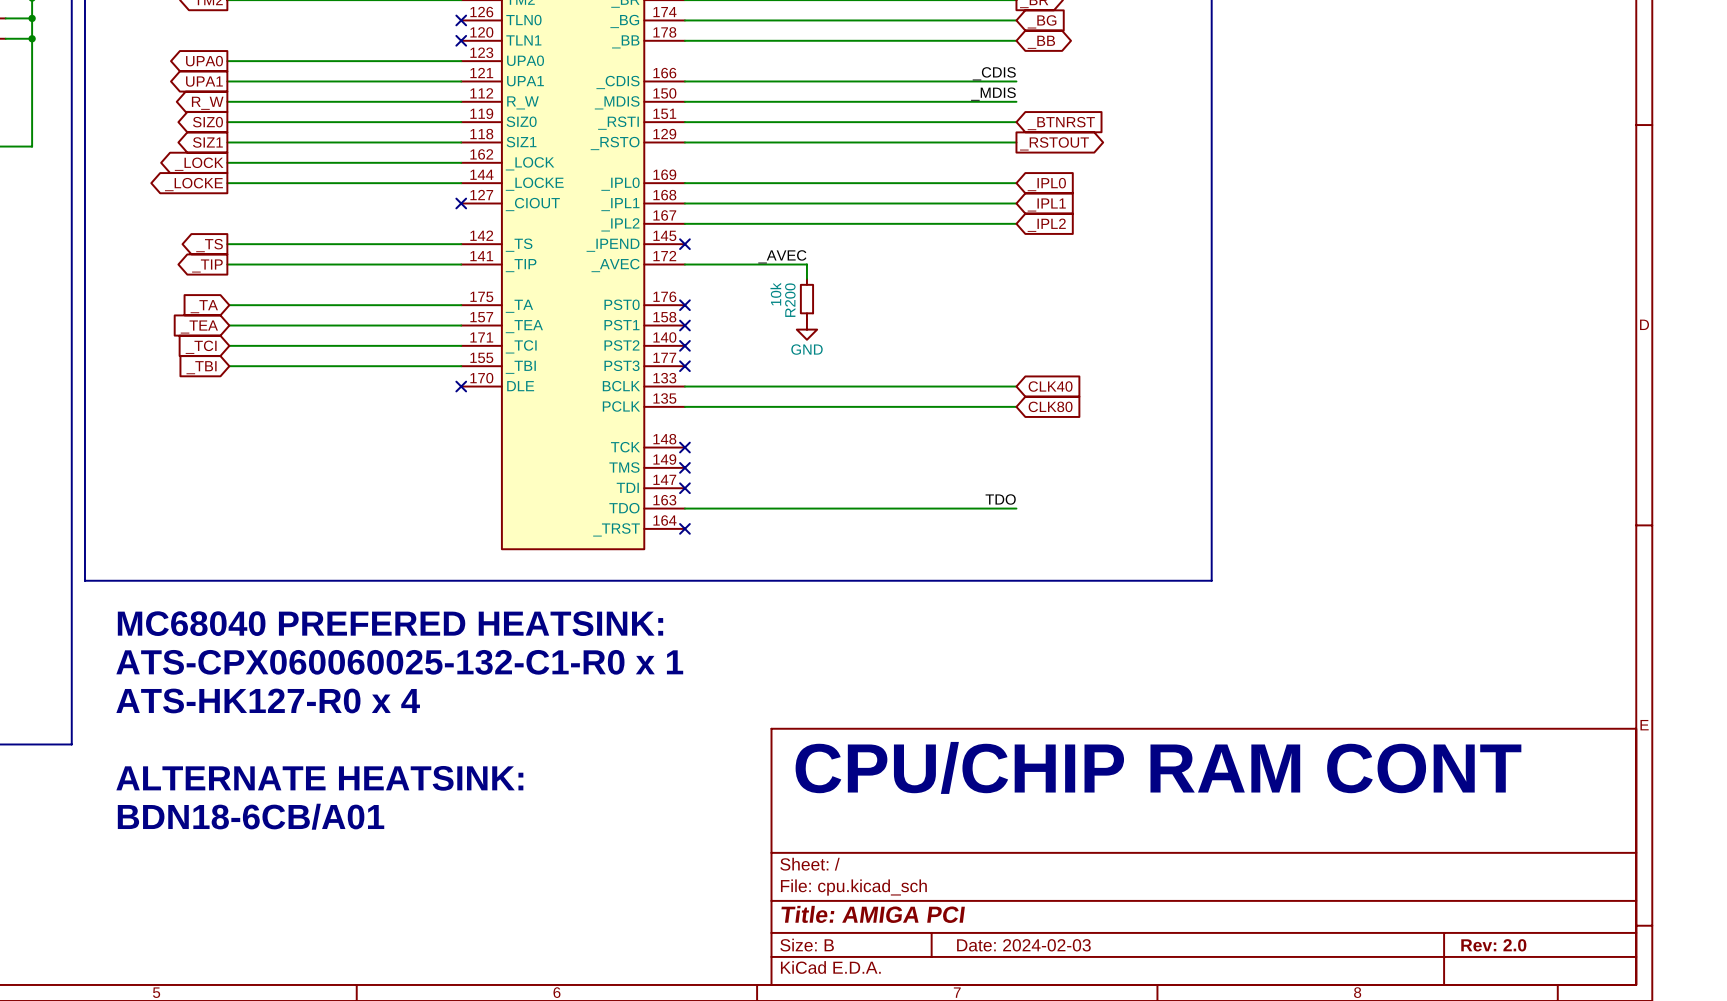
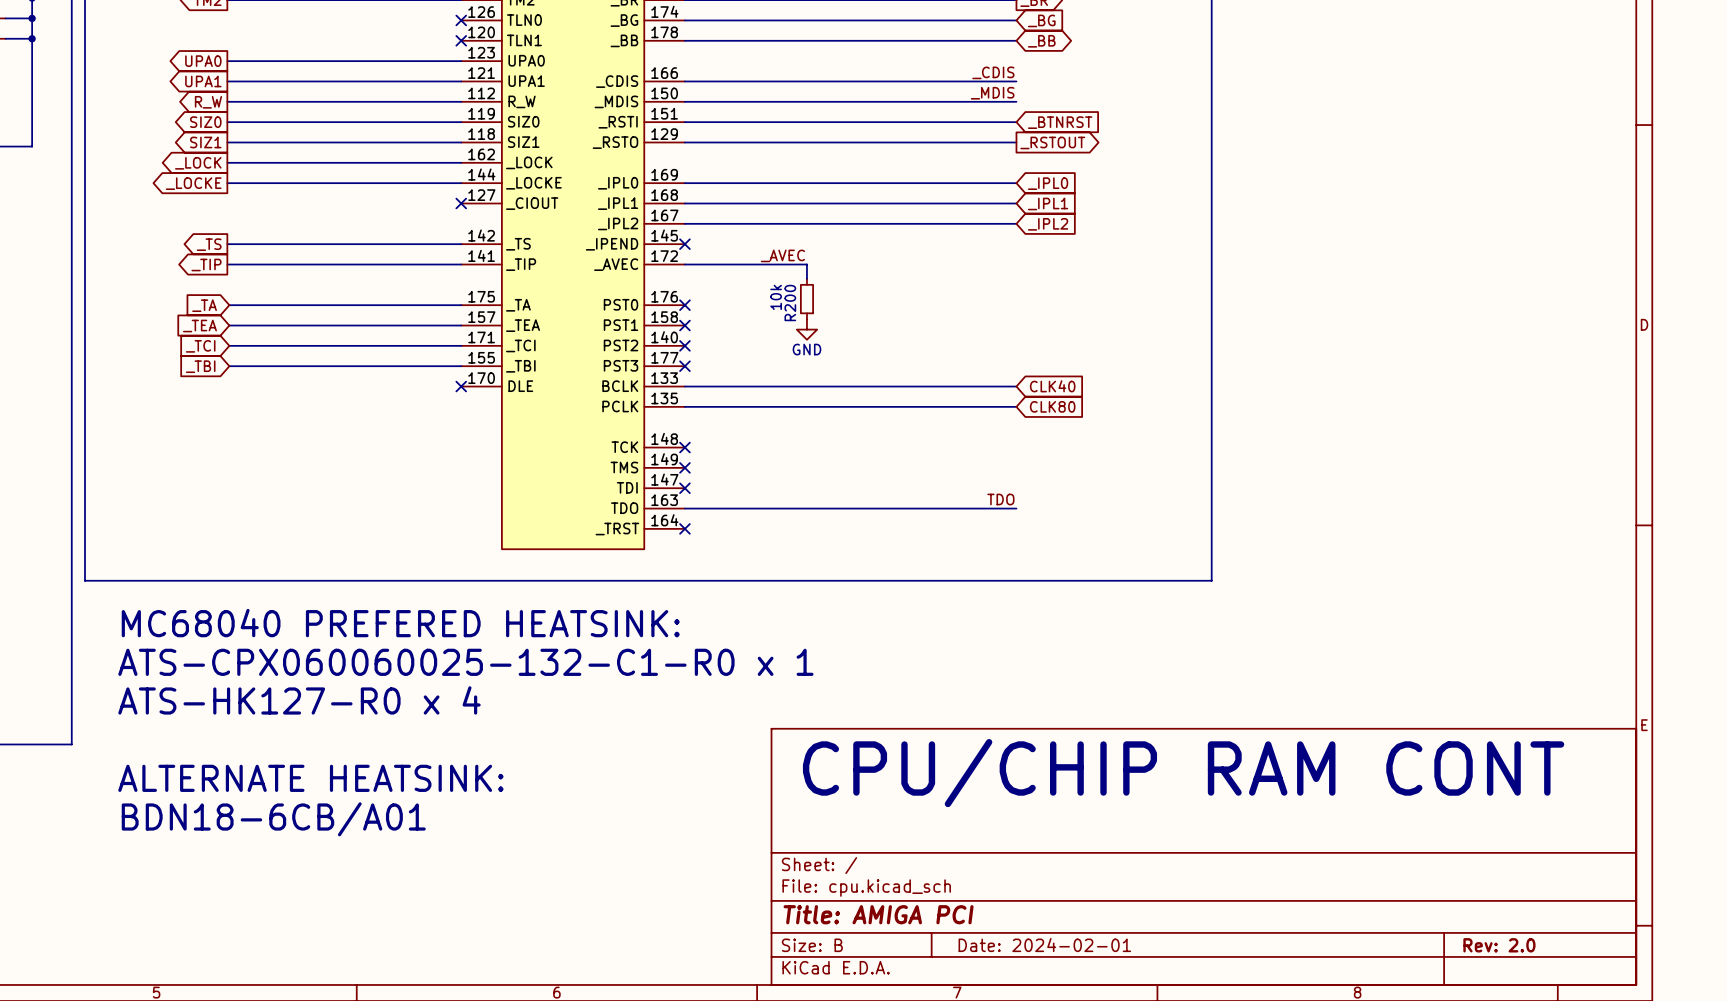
title block: Date: 2024-02-03 (1023, 945) -> Date: 2024-02-01 (1044, 945)

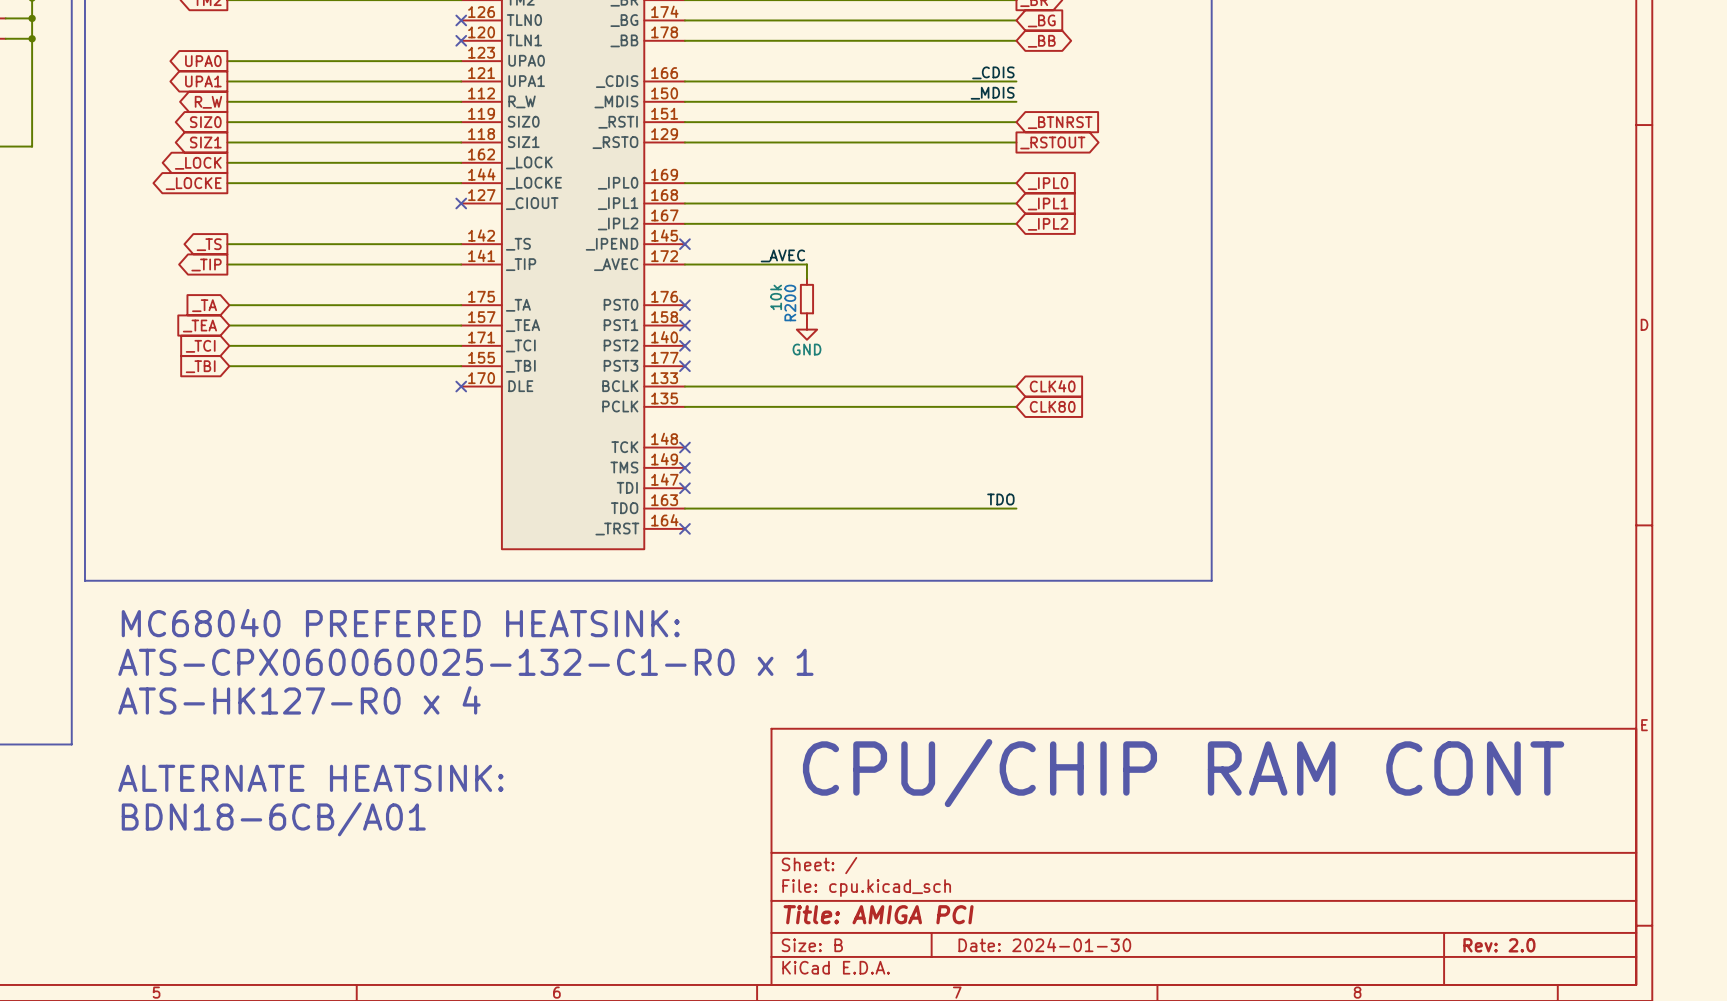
title block: Date: 2024-02-01 (1044, 945) -> Date: 2024-01-30 (1044, 945)

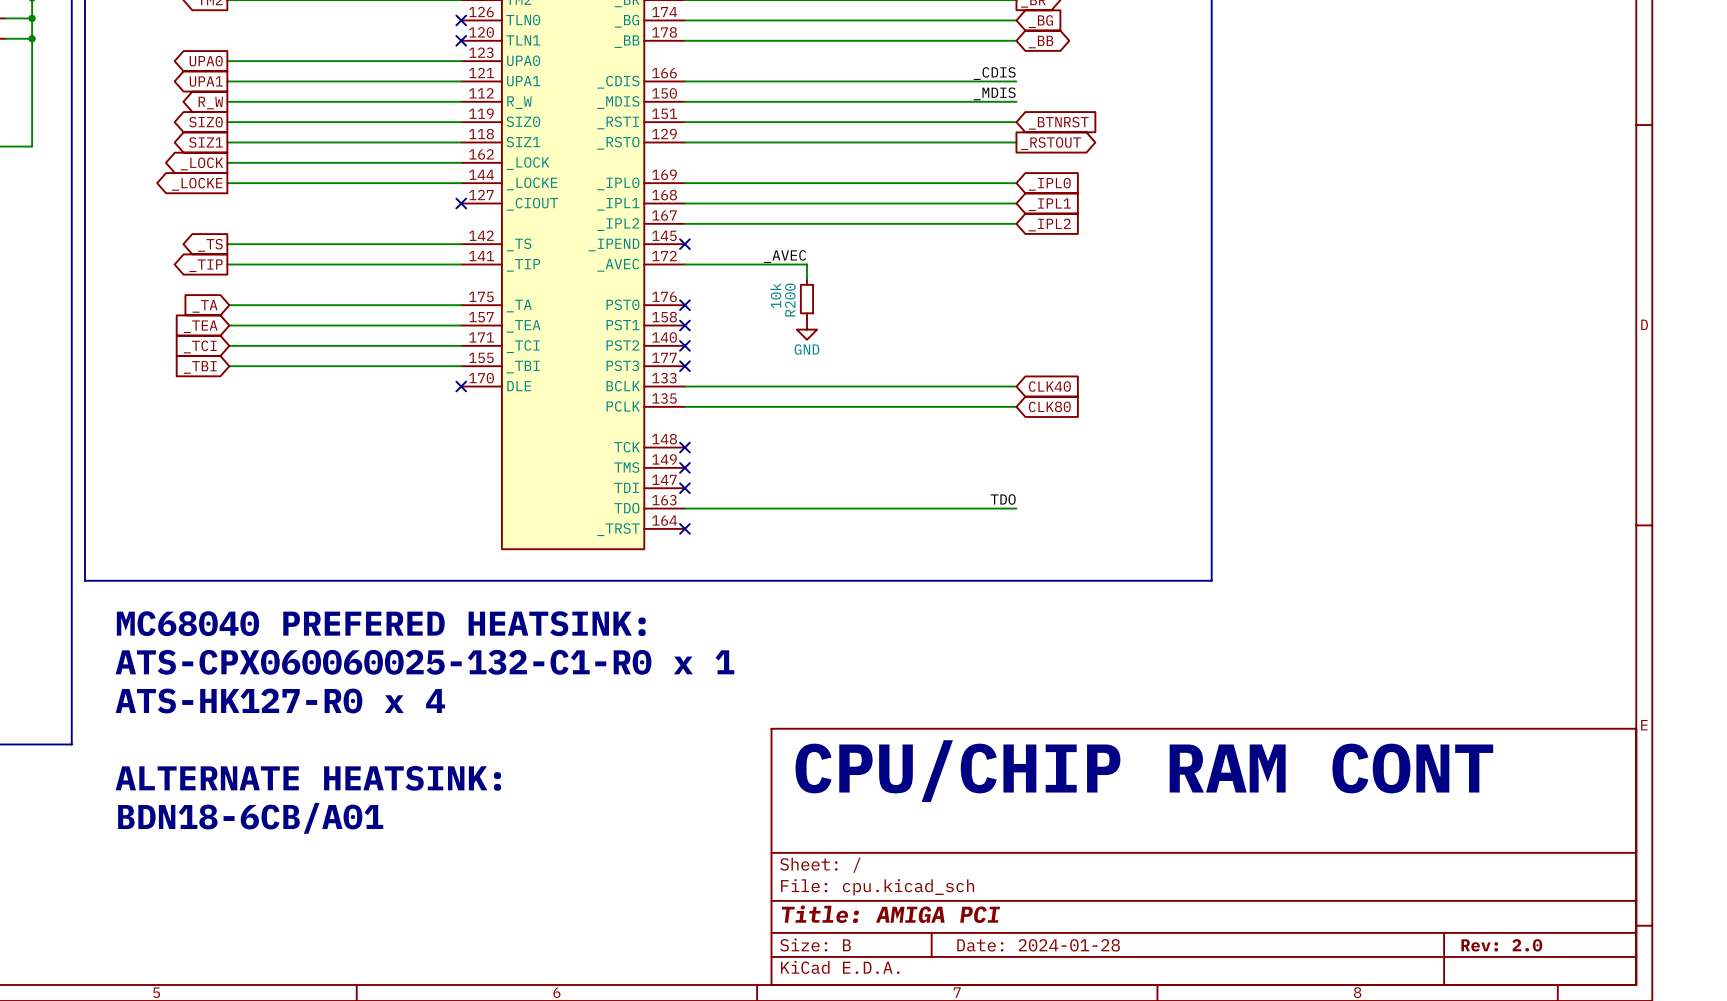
title block: Date: 2024-01-30 (1044, 945) -> Date: 2024-01-28 (1038, 945)

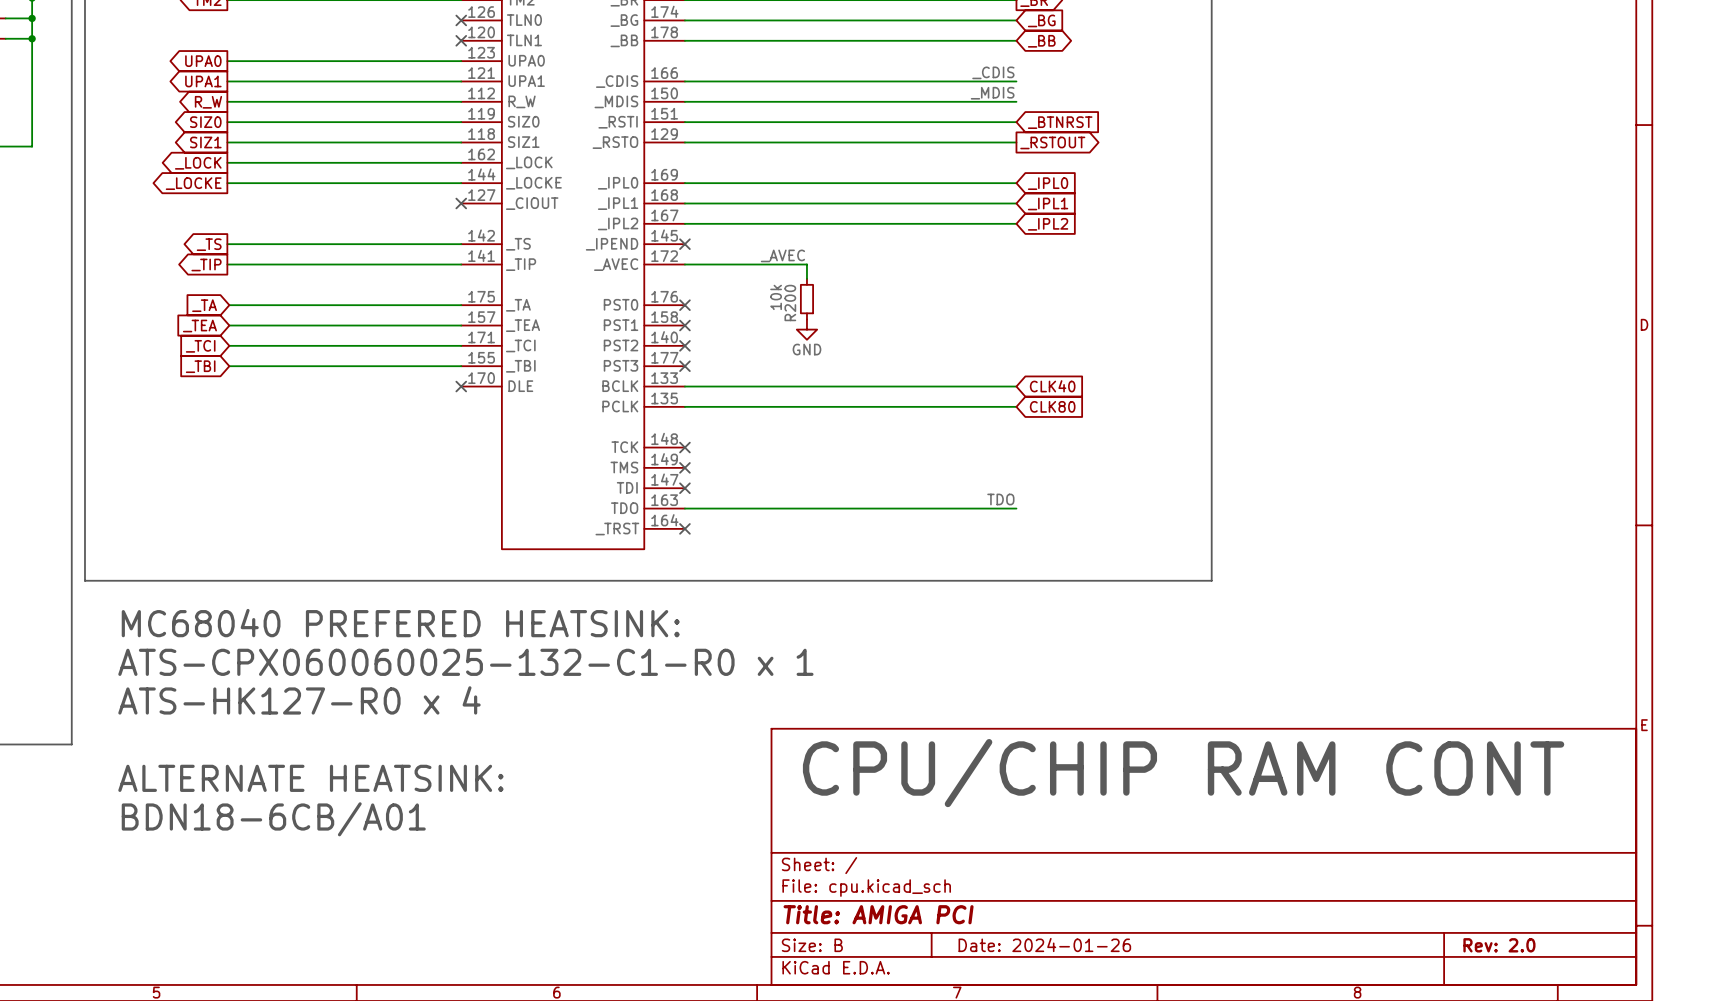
title block: Date: 2024-01-28 (1038, 945) -> Date: 2024-01-26 (1044, 945)

